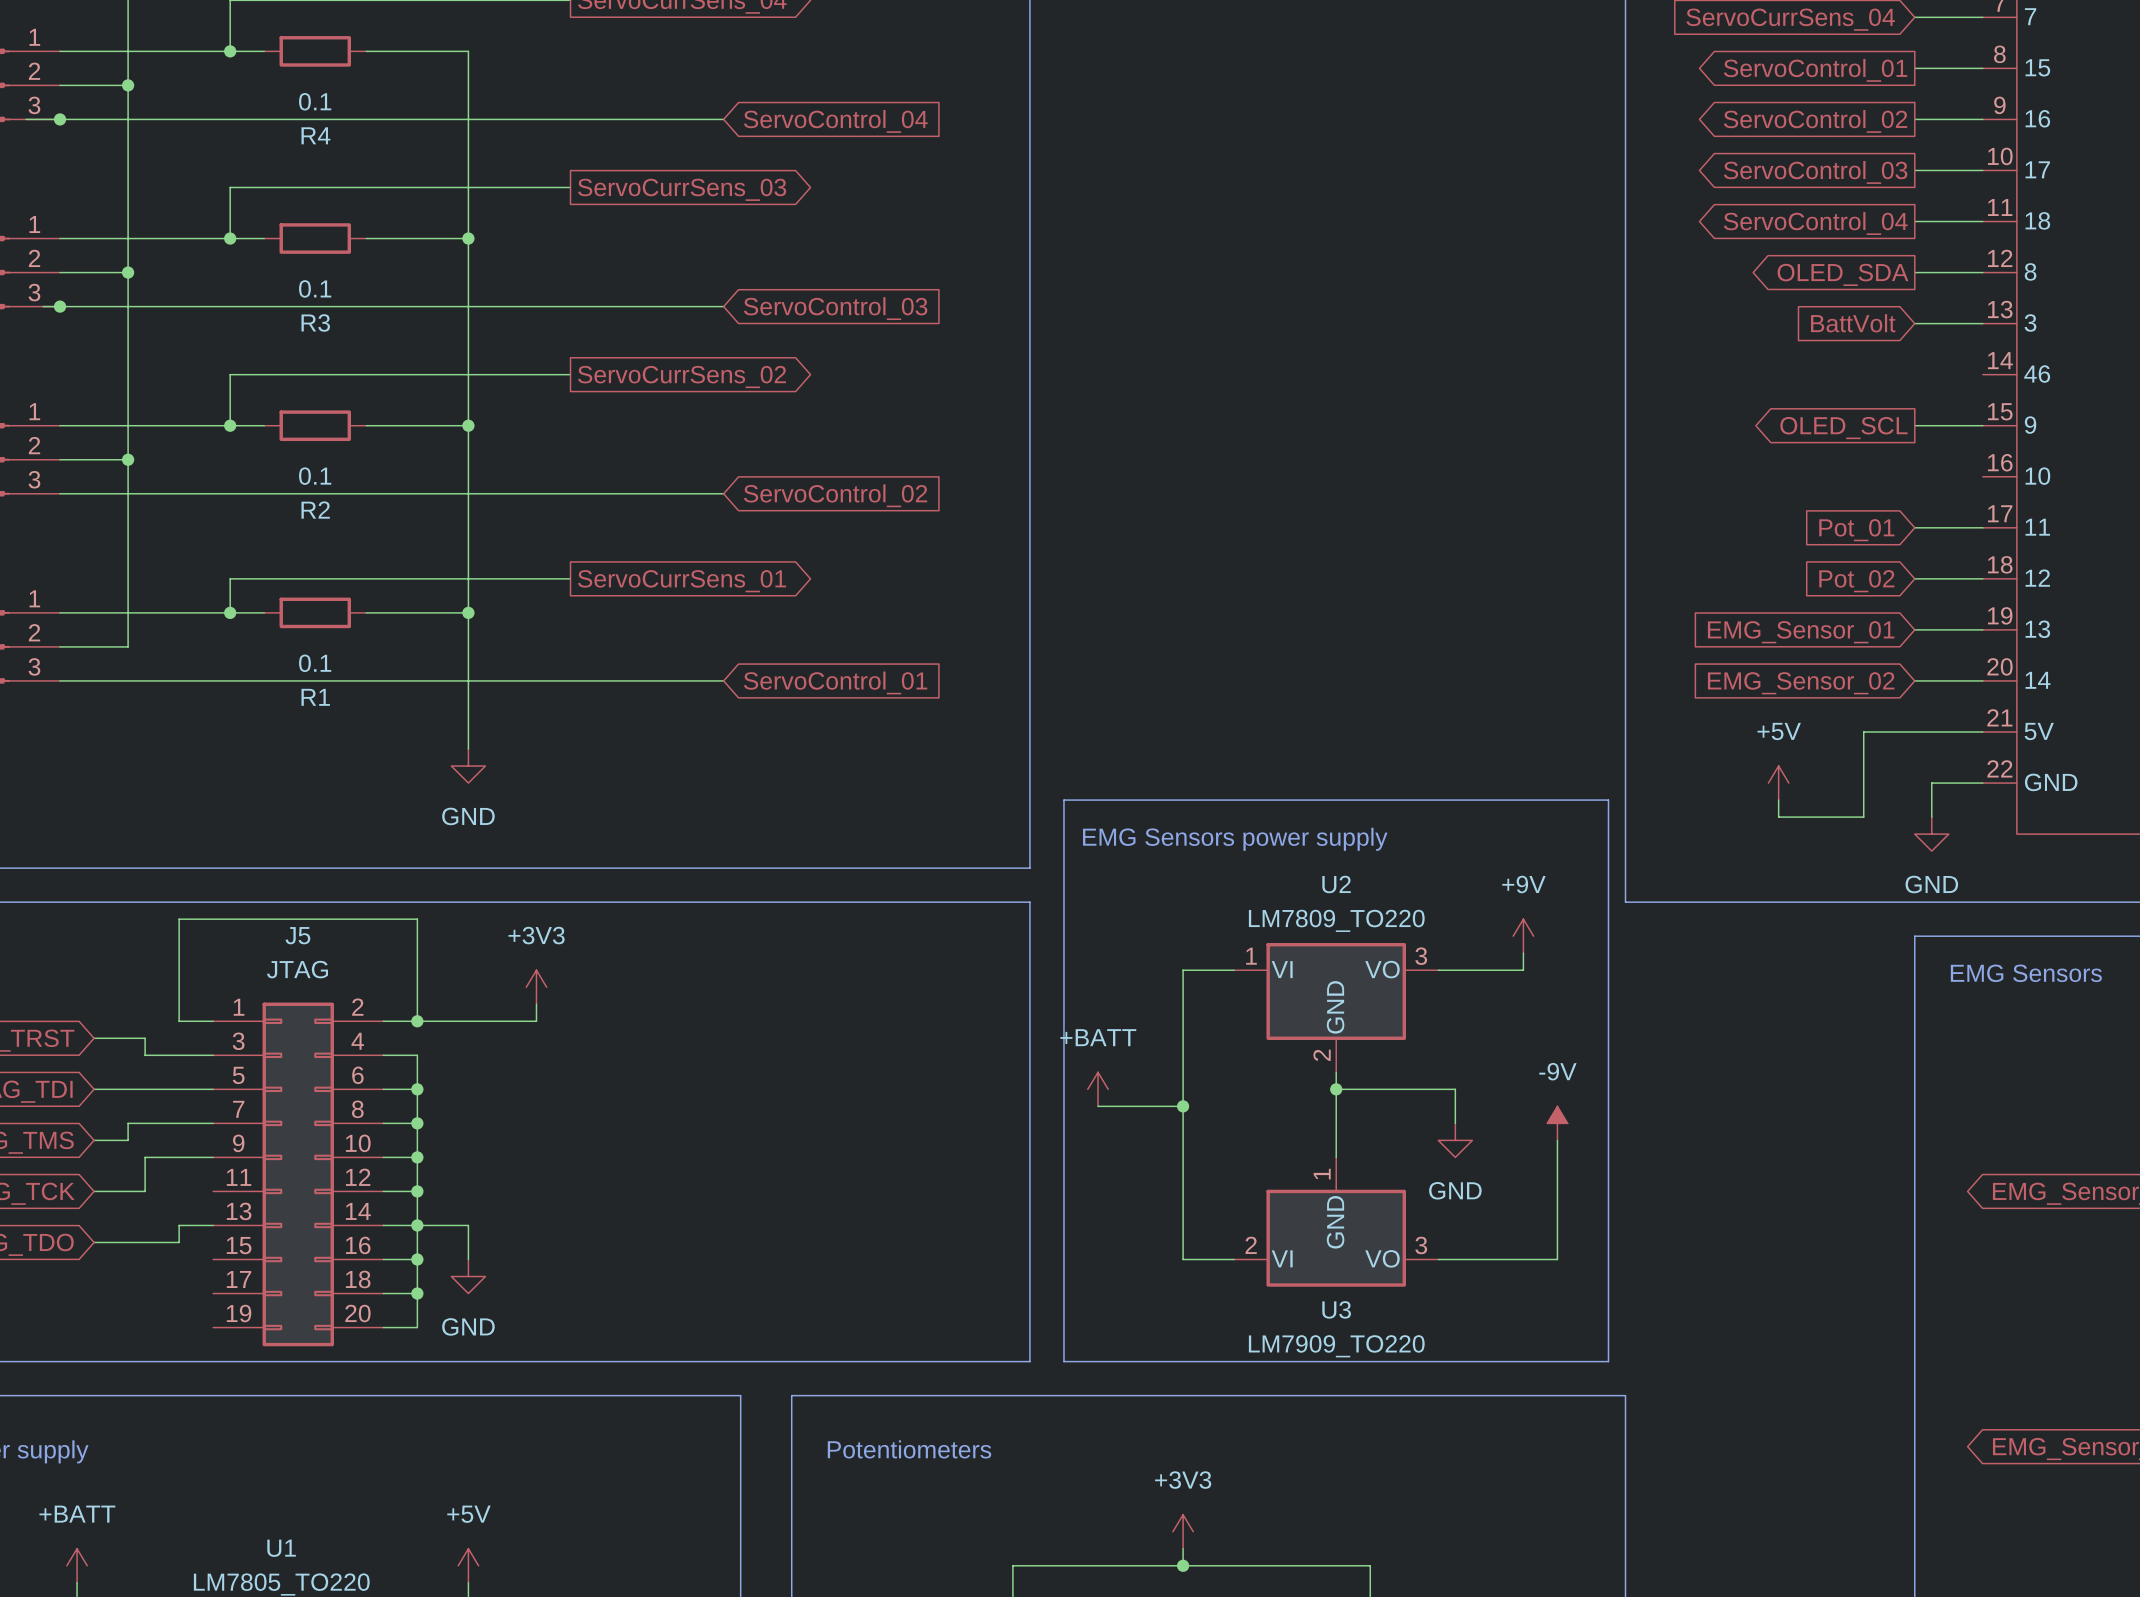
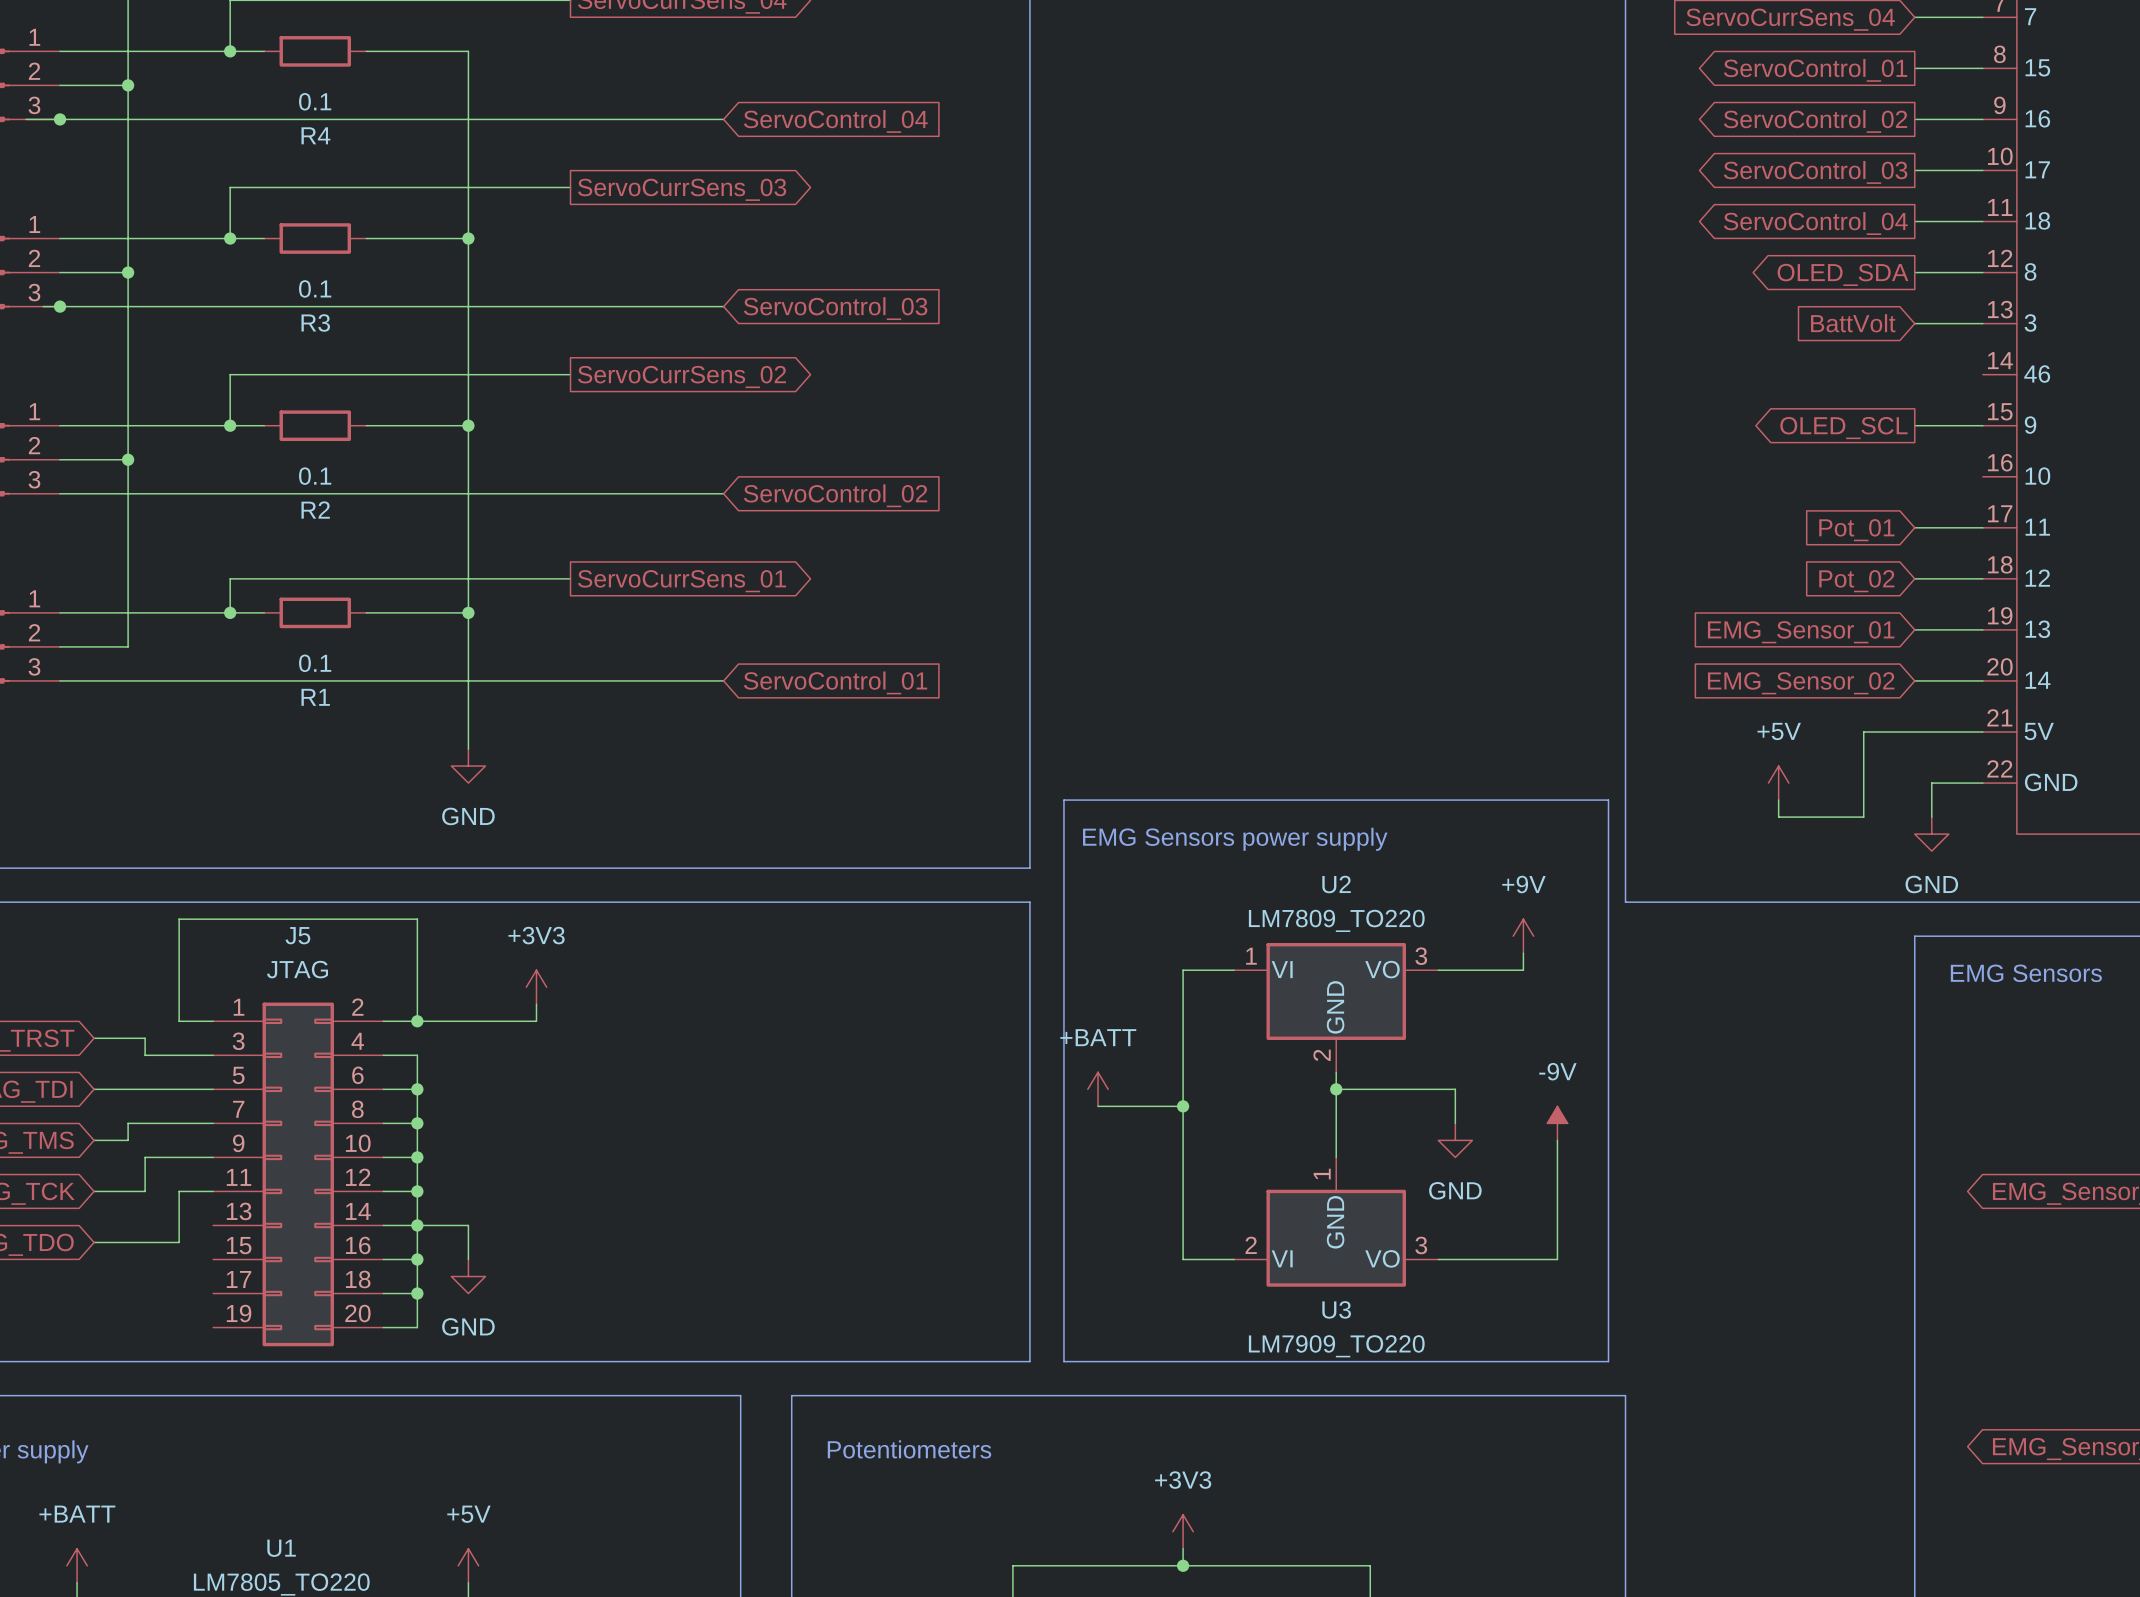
wire: (179, 1225) (213, 1225) -> (179, 1225) (179, 1191) (213, 1191)

